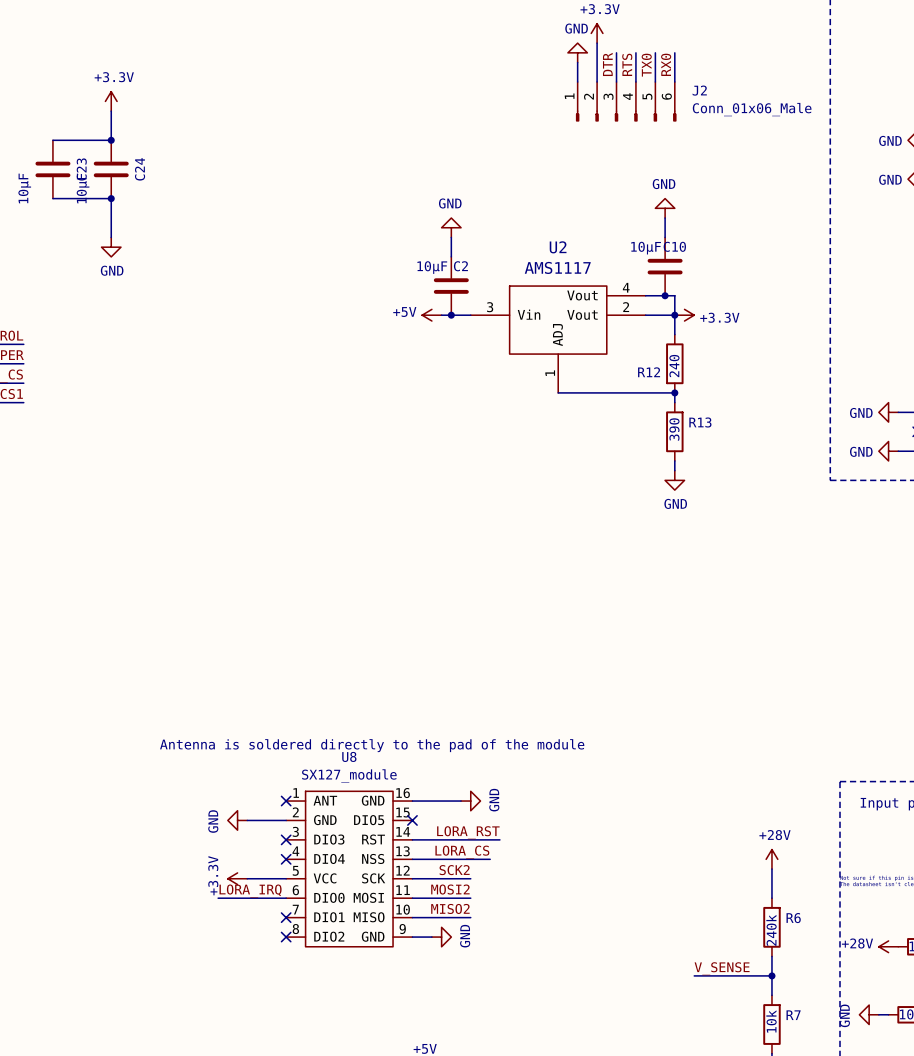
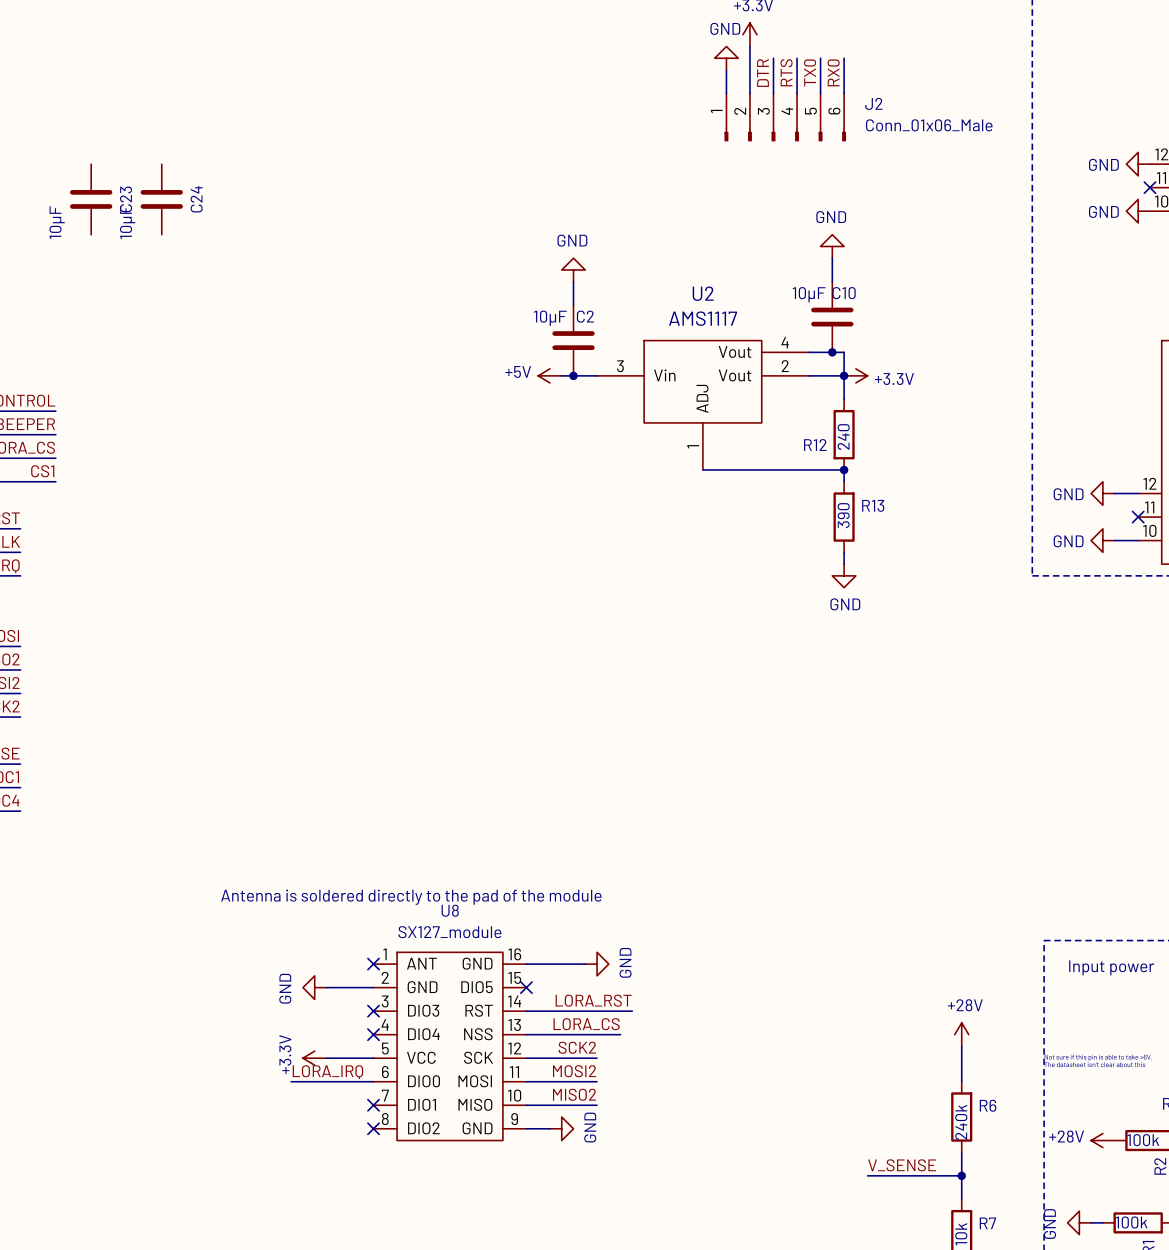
power symbol: +3.3V (111, 101) -> none
wire: (111, 111) (111, 140) (52, 140) -> none
junction: (111, 140) -> none
wire: (52, 198) (111, 198) (111, 237) -> none
junction: (111, 198) -> none
power symbol: GND (111, 247) -> none

